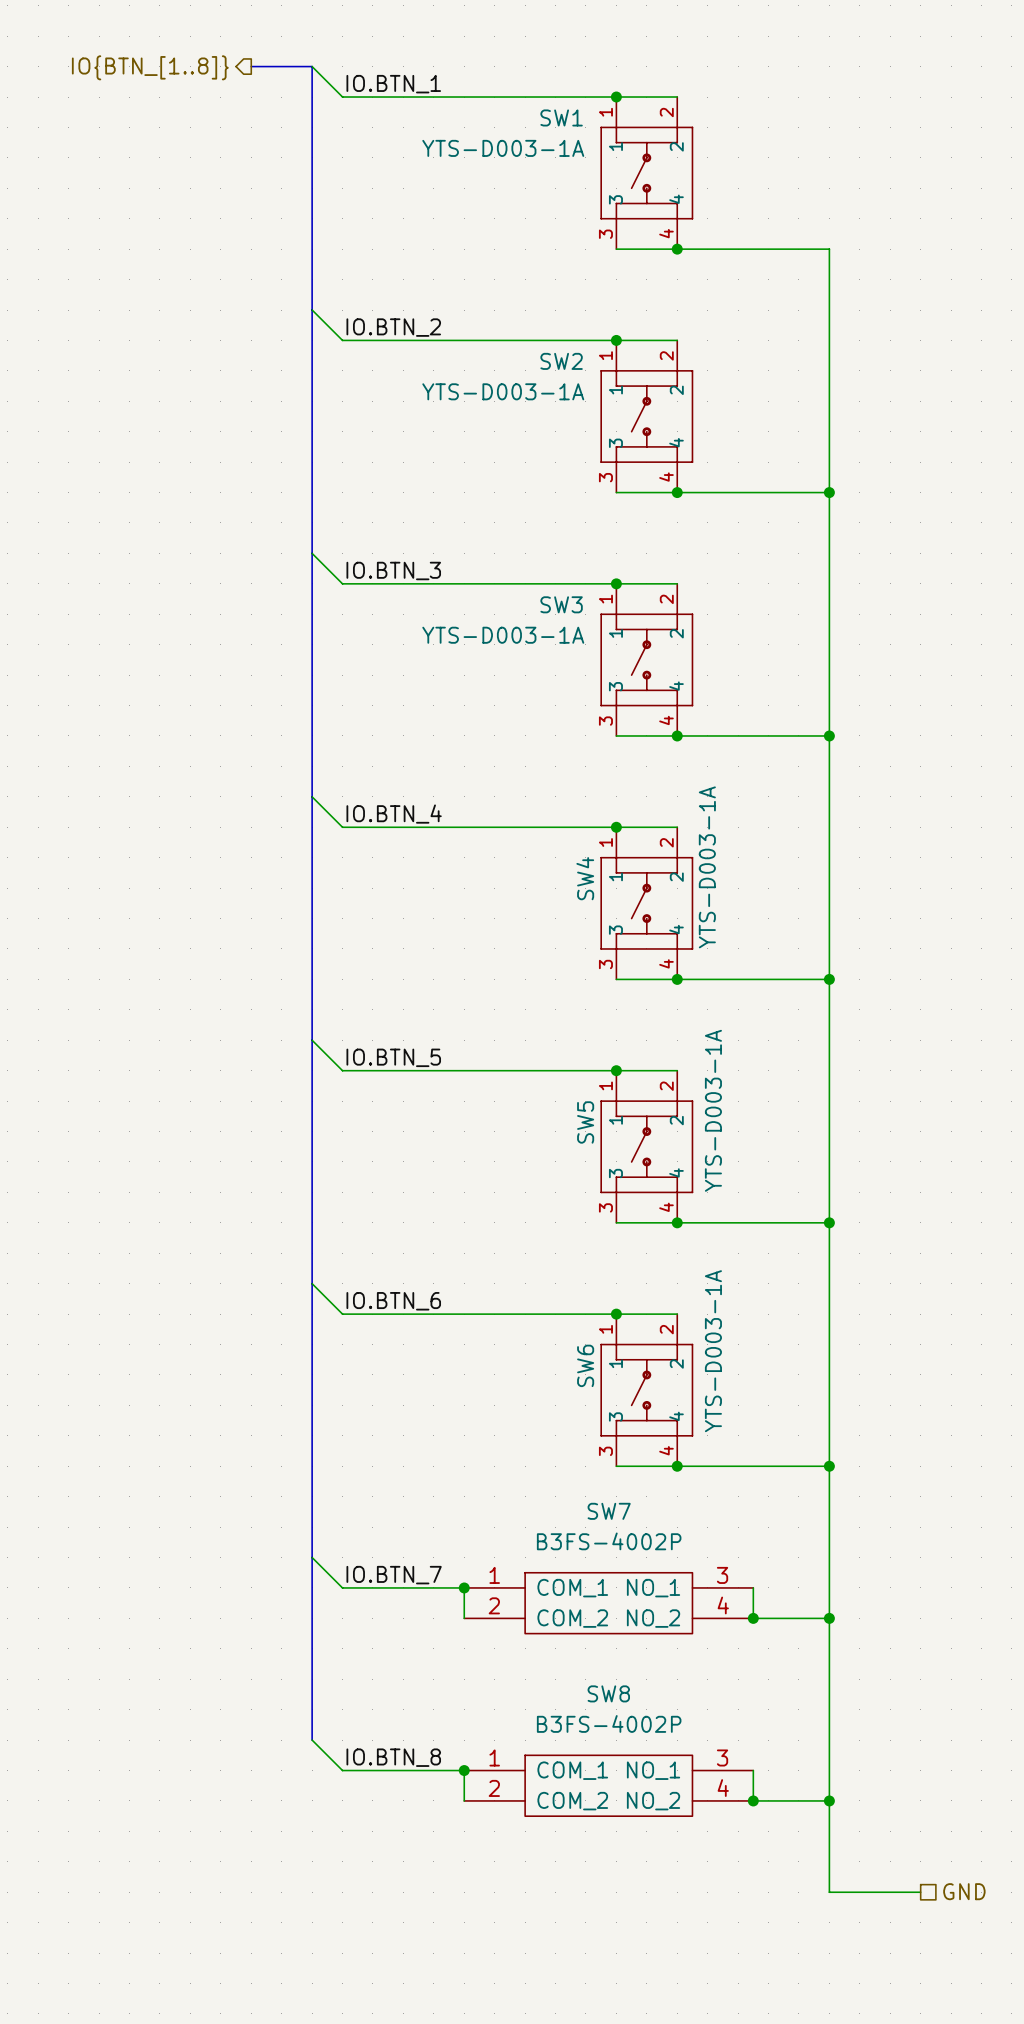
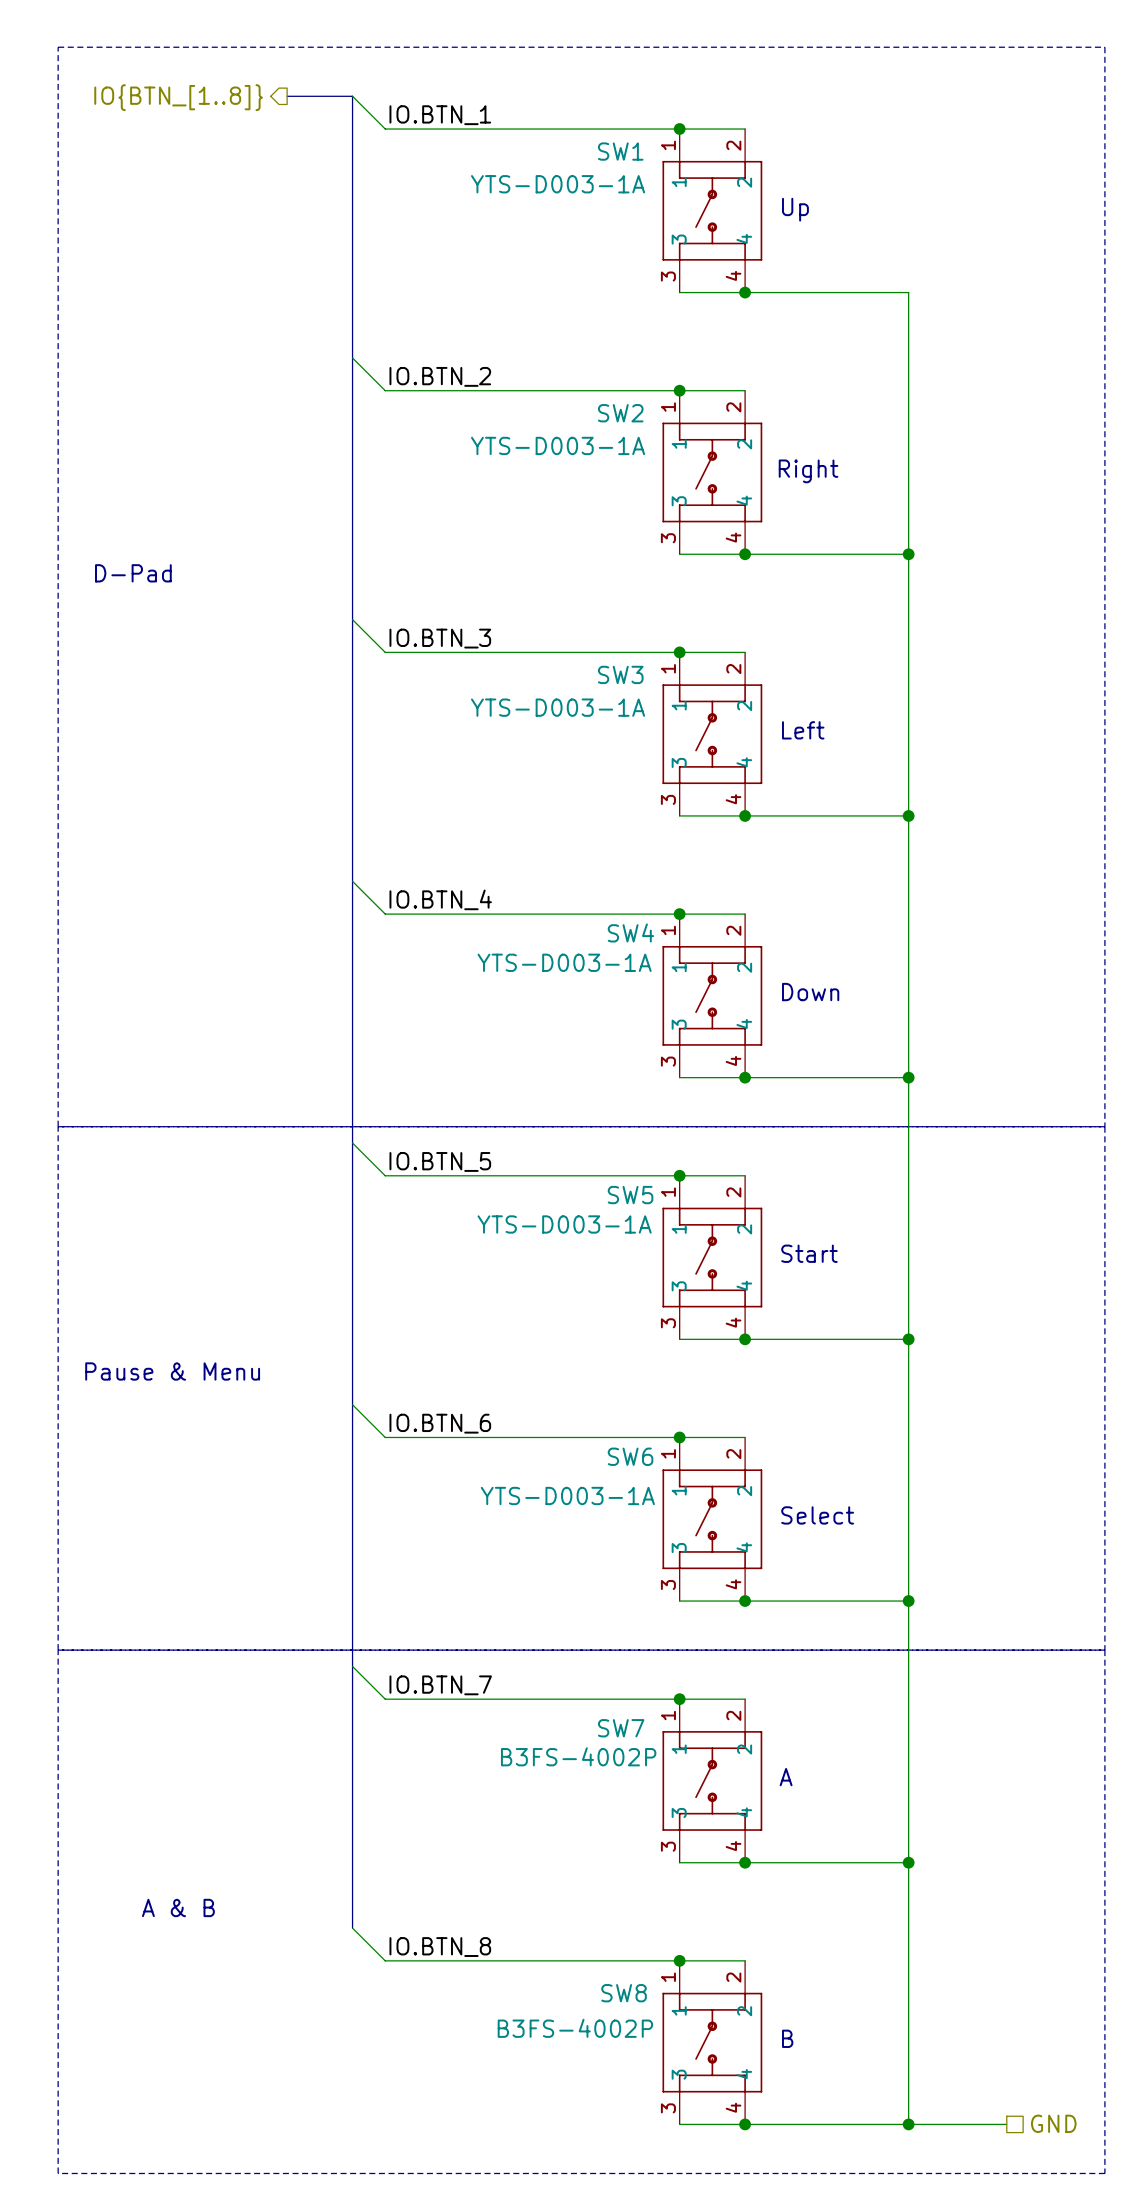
line: none -> (58, 47) (1104, 47) (1104, 2173) (58, 2173) (58, 47)
text: none -> Up (795, 209)
text: none -> Right (808, 471)
text: none -> D-Pad (133, 573)
text: none -> Left (803, 730)
SW4 value rotation: 0° (707, 867) -> 90° clockwise (564, 962)
SW4 value position: YTS-D003-1A (707, 867) -> YTS-D003-1A (564, 962)
SW4 name rotation: 0° (585, 878) -> 90° clockwise (630, 932)
text: none -> Down (810, 992)
line: none -> (58, 1126) (1104, 1126)
SW5 value rotation: 0° (713, 1110) -> 90° clockwise (564, 1224)
SW5 value position: YTS-D003-1A (713, 1110) -> YTS-D003-1A (564, 1224)
SW5 name rotation: 0° (585, 1122) -> 90° clockwise (630, 1195)
text: none -> Start (809, 1253)
text: none -> Pause & Menu (172, 1371)
SW6 value rotation: 0° (713, 1351) -> 90° clockwise (567, 1495)
SW6 value position: YTS-D003-1A (713, 1351) -> YTS-D003-1A (567, 1495)
SW6 name rotation: 0° (585, 1365) -> 90° clockwise (630, 1456)
text: none -> Select (817, 1515)
line: none -> (58, 1650) (1104, 1650)
SW7 name position: SW7 (609, 1511) -> SW7 (621, 1728)
wire: none -> (352, 1666) (385, 1699) (745, 1699)
SW7 value position: B3FS-4002P (609, 1541) -> B3FS-4002P (578, 1756)
wire: (312, 1557) (342, 1587) (464, 1587) (464, 1618) -> none
junction: none -> (679, 1699)
SW7 symbol: [464, 1572, 754, 1634] -> [662, 1699, 763, 1863]
label position: IO.BTN_7 (394, 1575) -> IO.BTN_7 (440, 1685)
junction: (464, 1587) -> none
wire: (753, 1587) (753, 1618) (829, 1618) -> none
junction: (753, 1618) -> none
junction: (829, 1618) -> none
text: none -> A (786, 1777)
SW8 name position: SW8 (608, 1693) -> SW8 (624, 1993)
wire: none -> (679, 1862) (908, 1862)
junction: none -> (745, 1862)
junction: none -> (908, 1862)
SW8 value position: B3FS-4002P (609, 1723) -> B3FS-4002P (575, 2028)
wire: (312, 1740) (342, 1770) (464, 1770) (464, 1800) -> none
bus: none -> (352, 1895) (352, 1928)
text: none -> A & B (178, 1907)
SW8 symbol: [464, 1755, 754, 1817] -> [662, 1960, 763, 2125]
label position: IO.BTN_8 (393, 1757) -> IO.BTN_8 (440, 1947)
wire: none -> (352, 1928) (385, 1960) (745, 1960)
junction: (464, 1770) -> none
wire: (753, 1770) (753, 1800) (829, 1800) -> none
junction: none -> (679, 1960)
junction: (753, 1800) -> none
junction: (829, 1800) -> none
text: none -> B (787, 2038)
hierarchical label position: GND (964, 1891) -> GND (1053, 2123)
wire: (829, 1892) (920, 1892) -> (908, 2059) (908, 2124)
wire: none -> (679, 2124) (1006, 2124)
junction: none -> (745, 2124)
junction: none -> (908, 2124)

